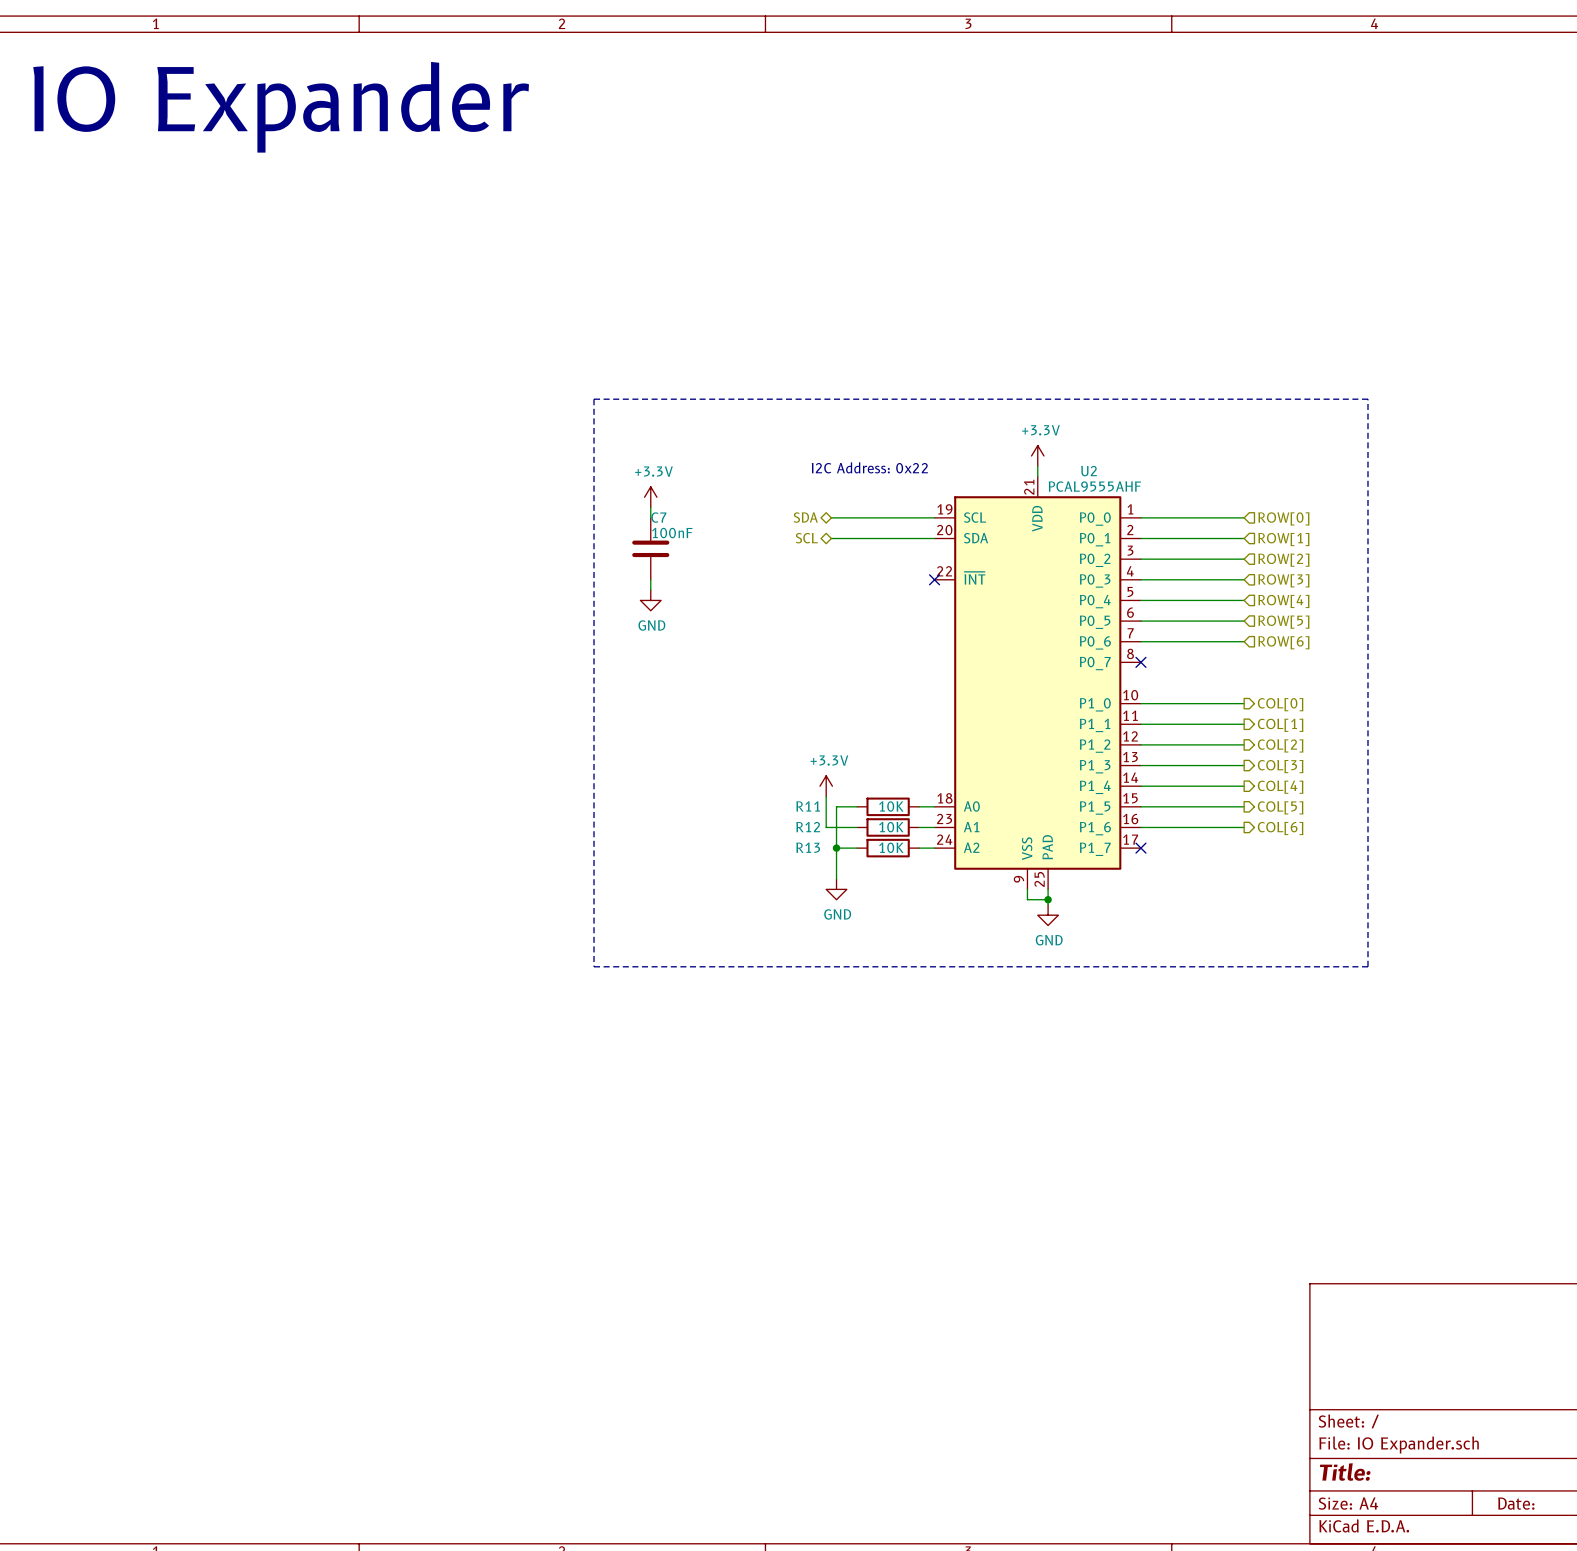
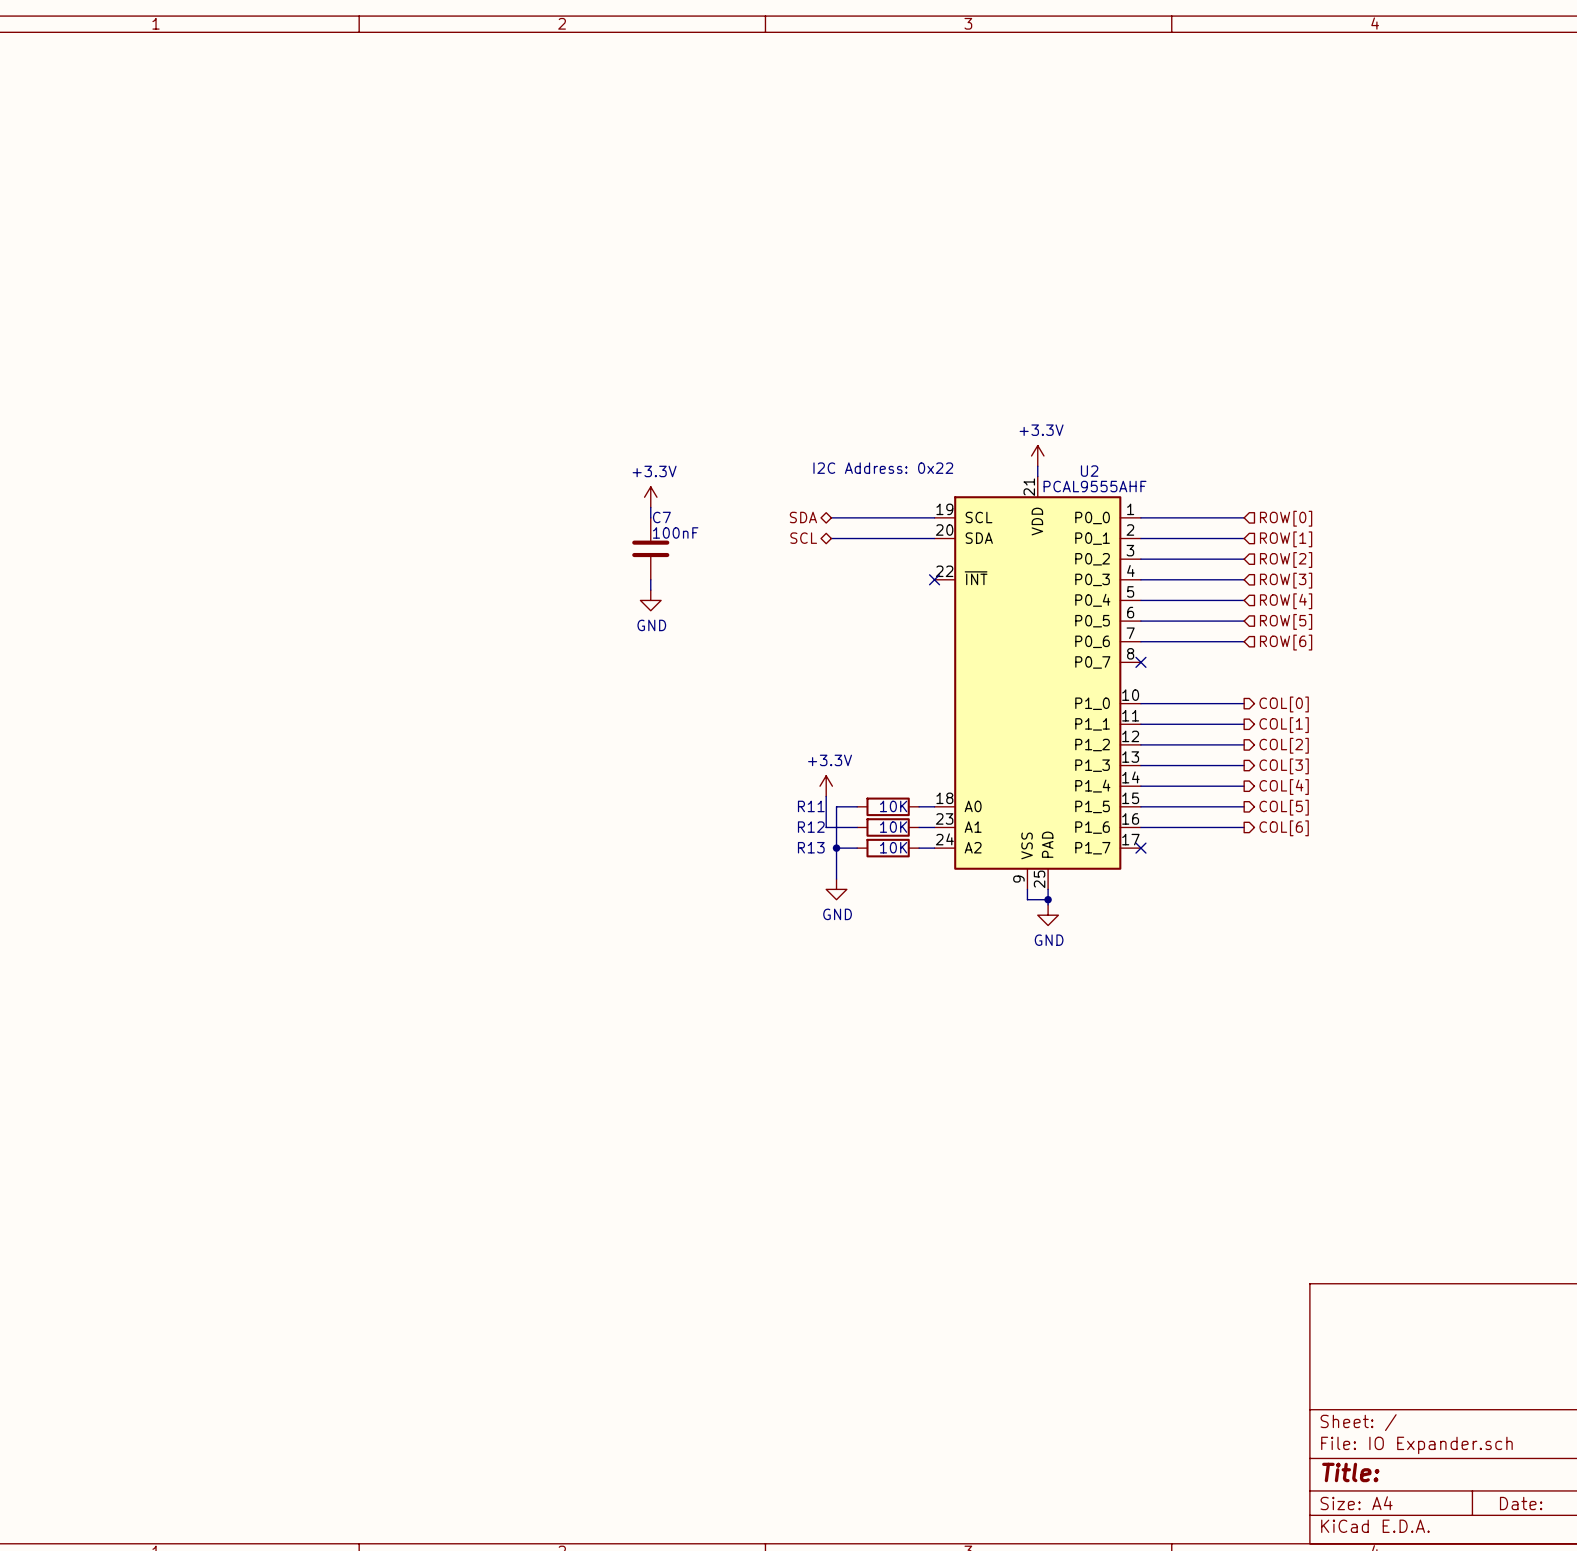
text: IO Expander (281, 107) -> none
line: (594, 399) (594, 966) (1367, 966) (1367, 399) (594, 399) -> none

